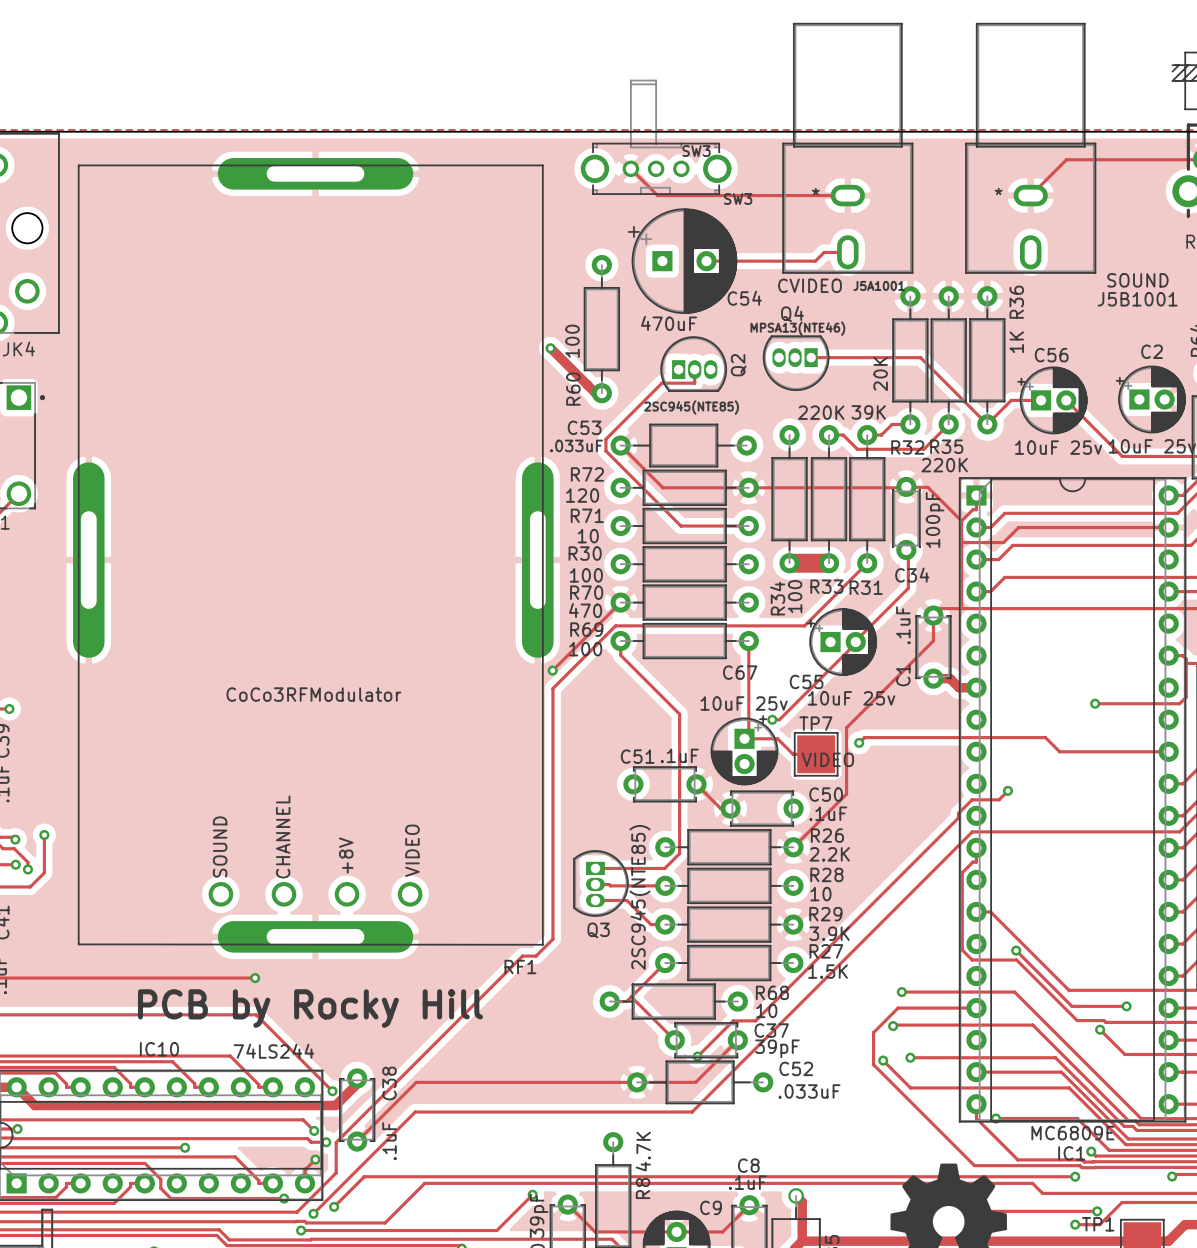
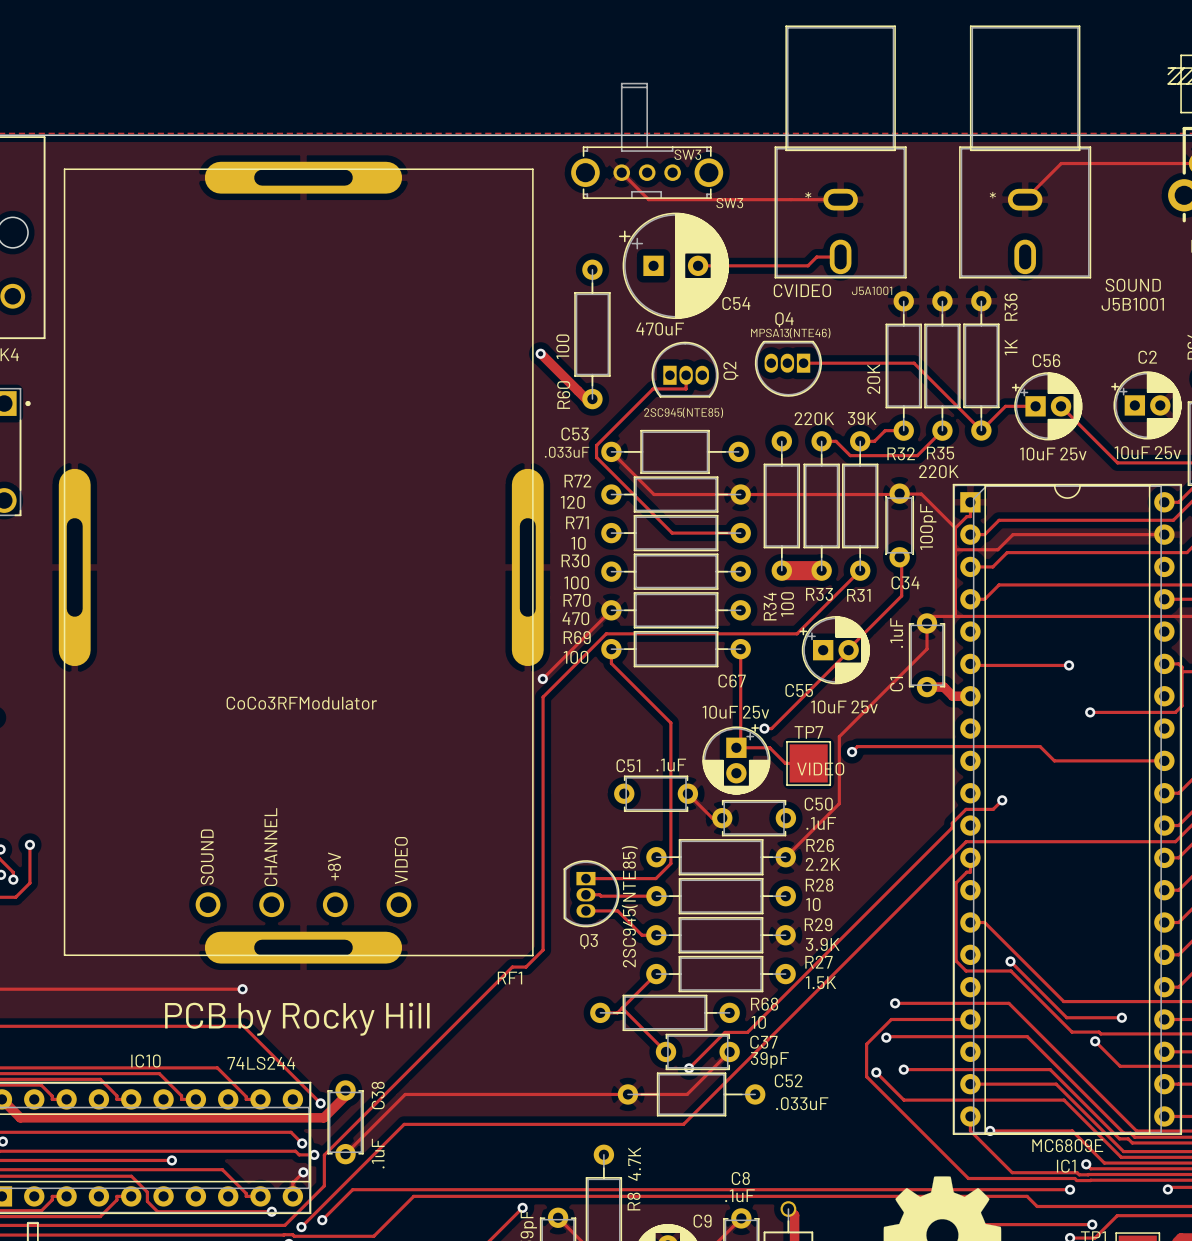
track: none -> (970, 663) (971, 665) (1069, 665)
via: none -> (1069, 665)

